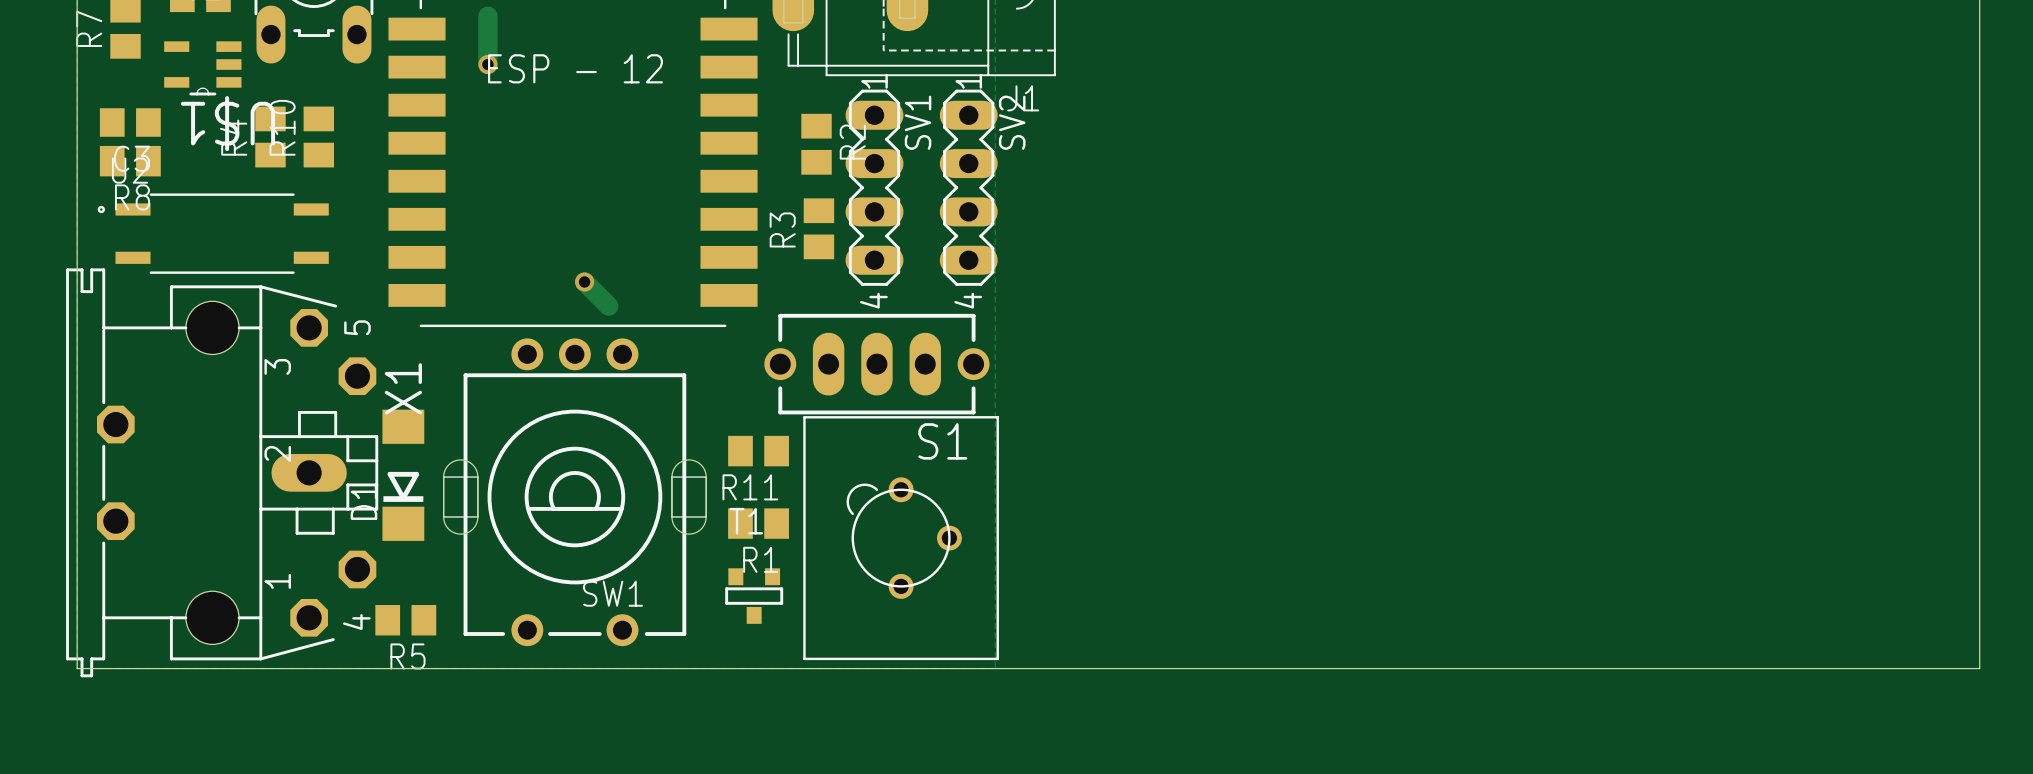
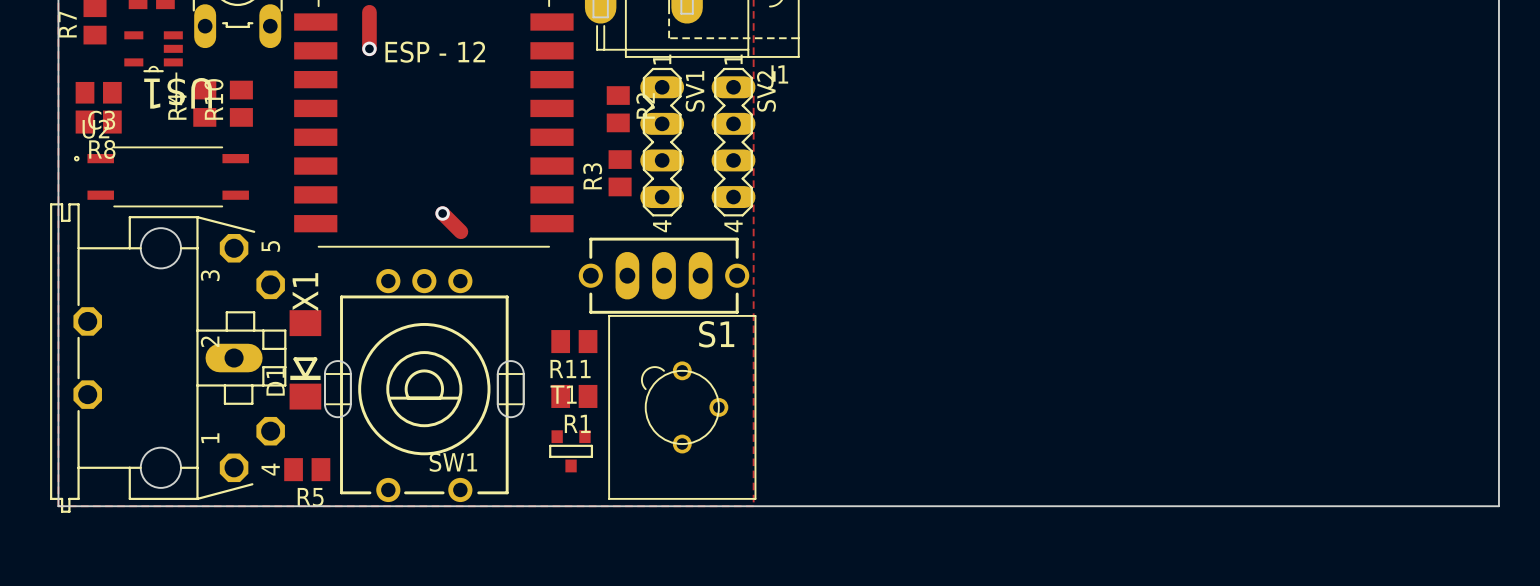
SW1 position: (574, 492) -> (424, 385)

